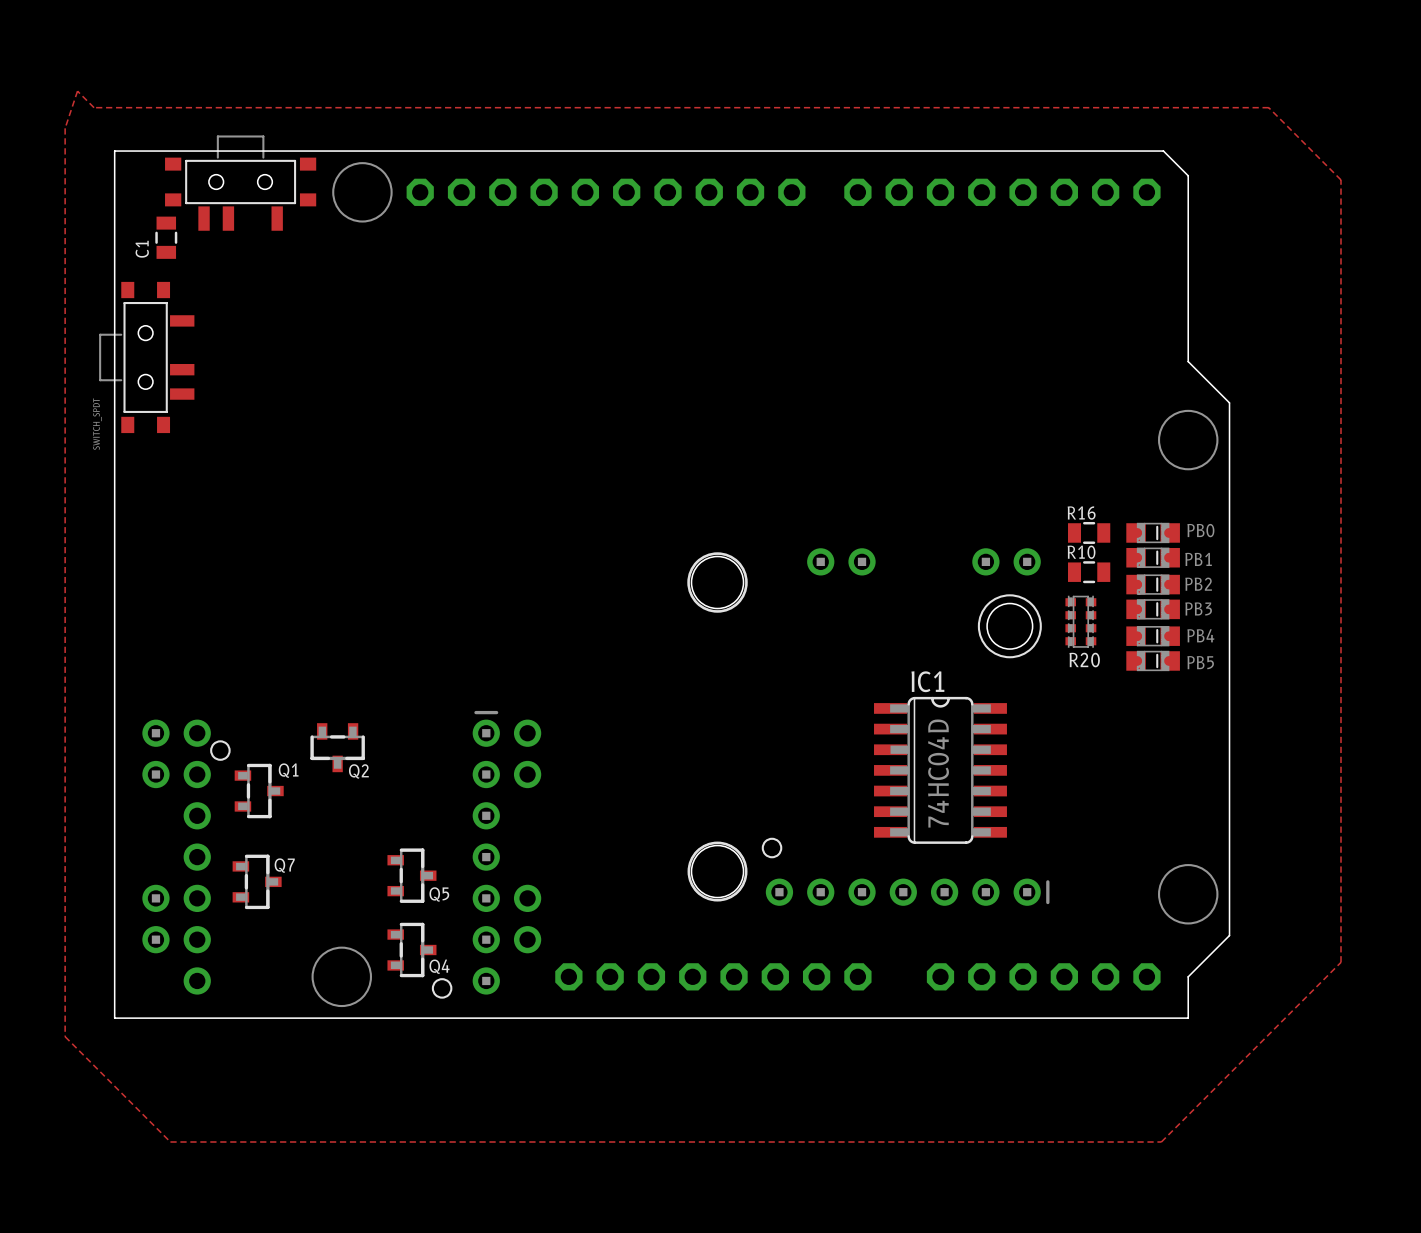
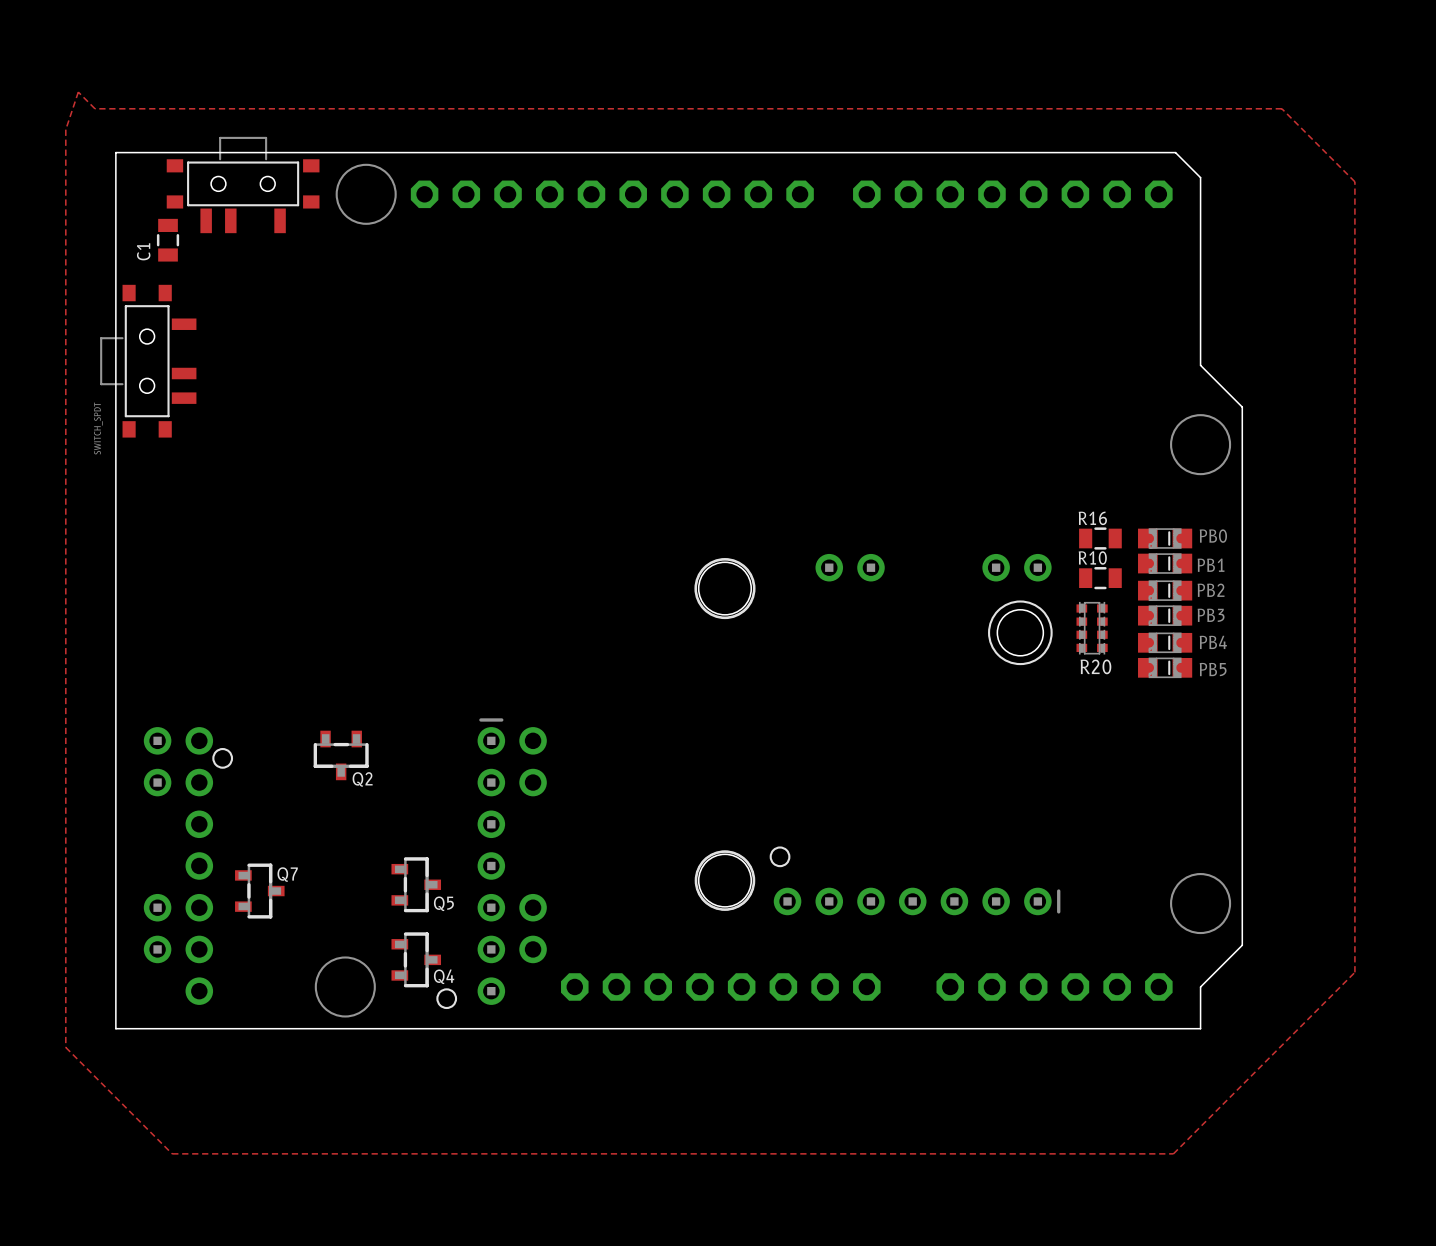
IC1: 74HC04D (940, 770) -> none
Q1: (259, 791) -> none

